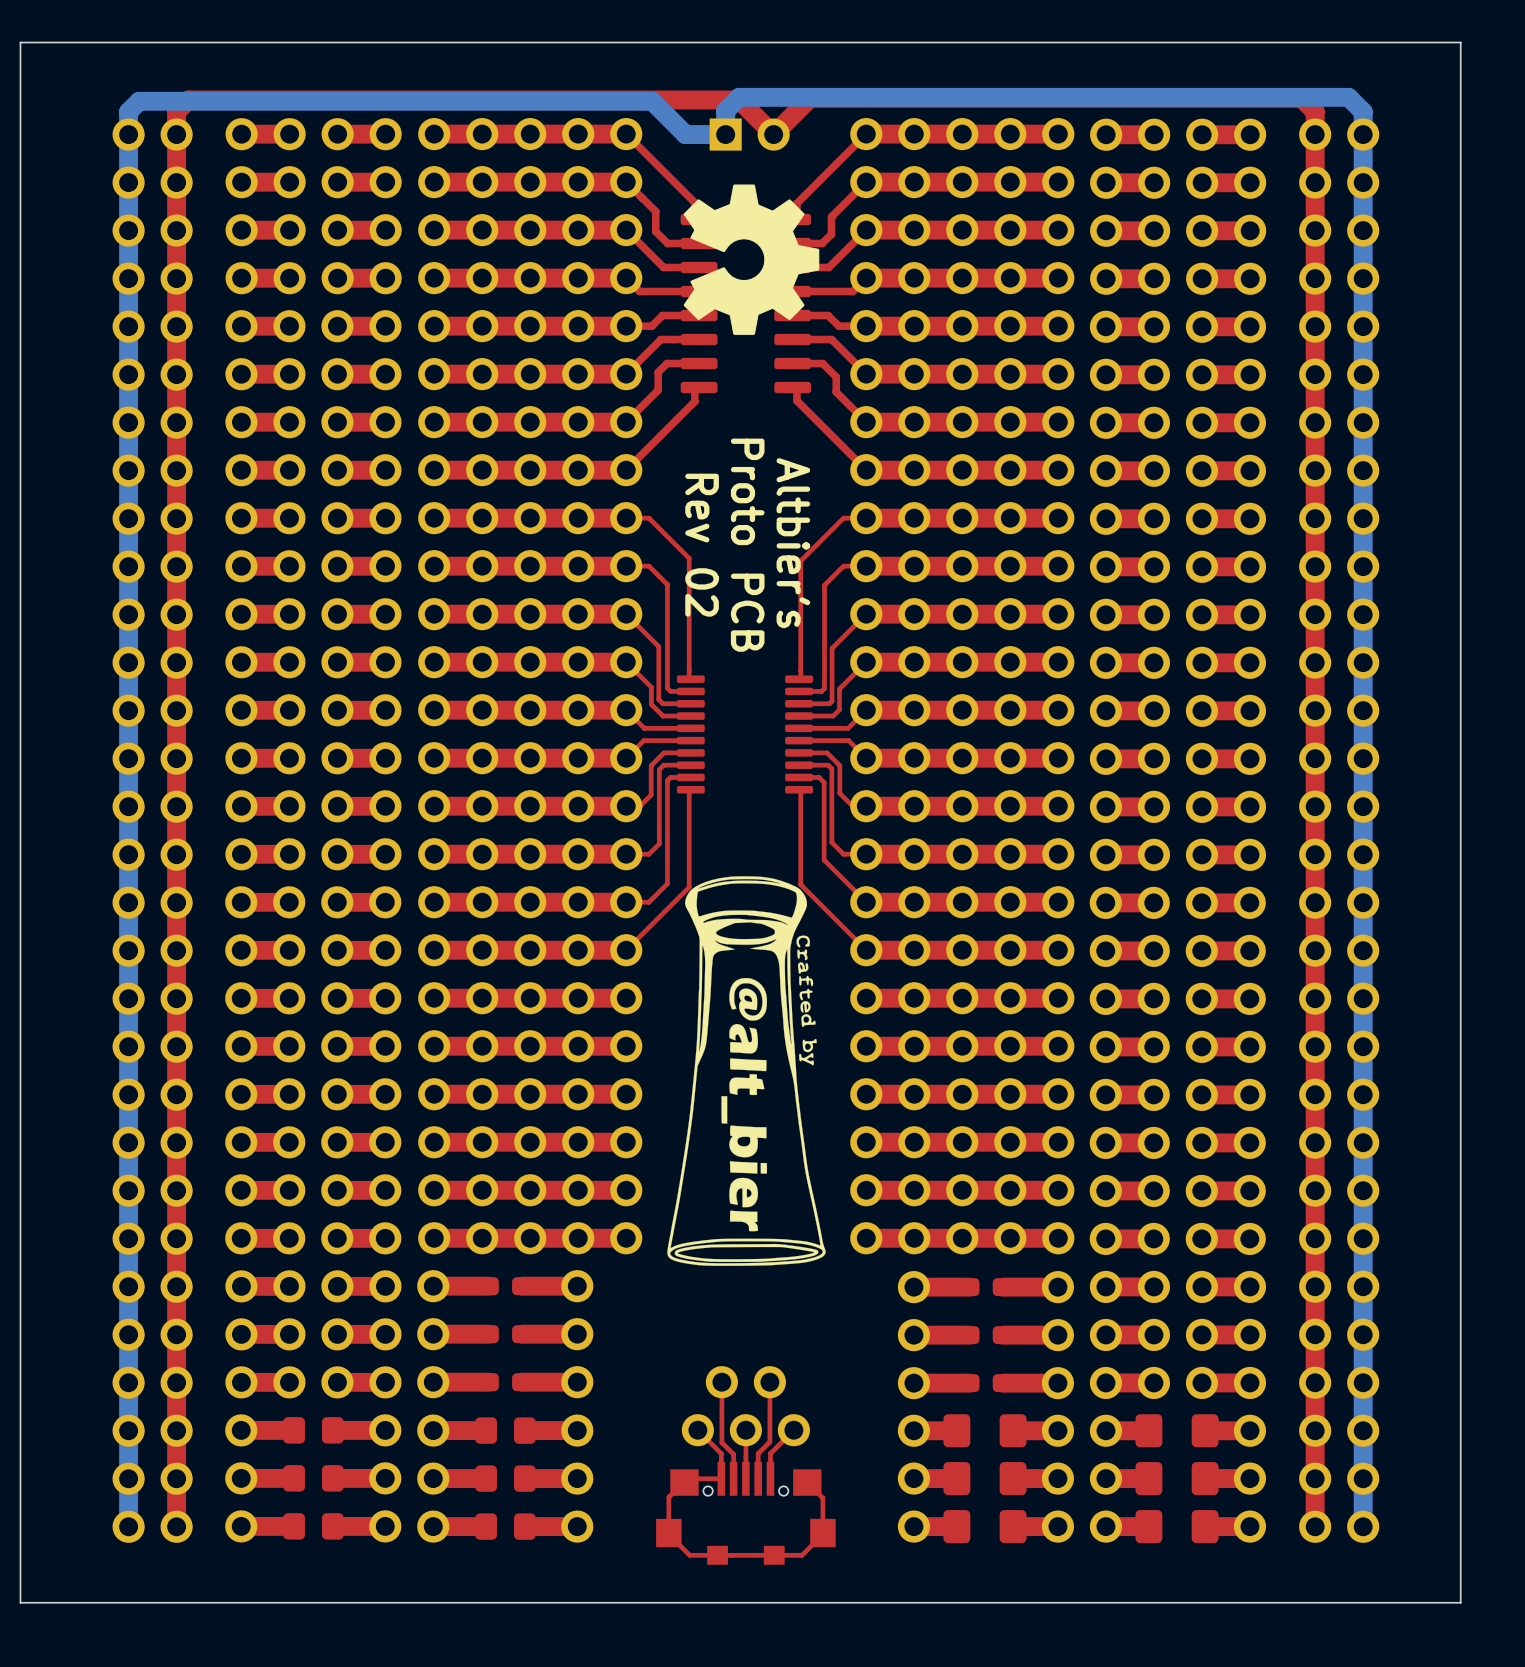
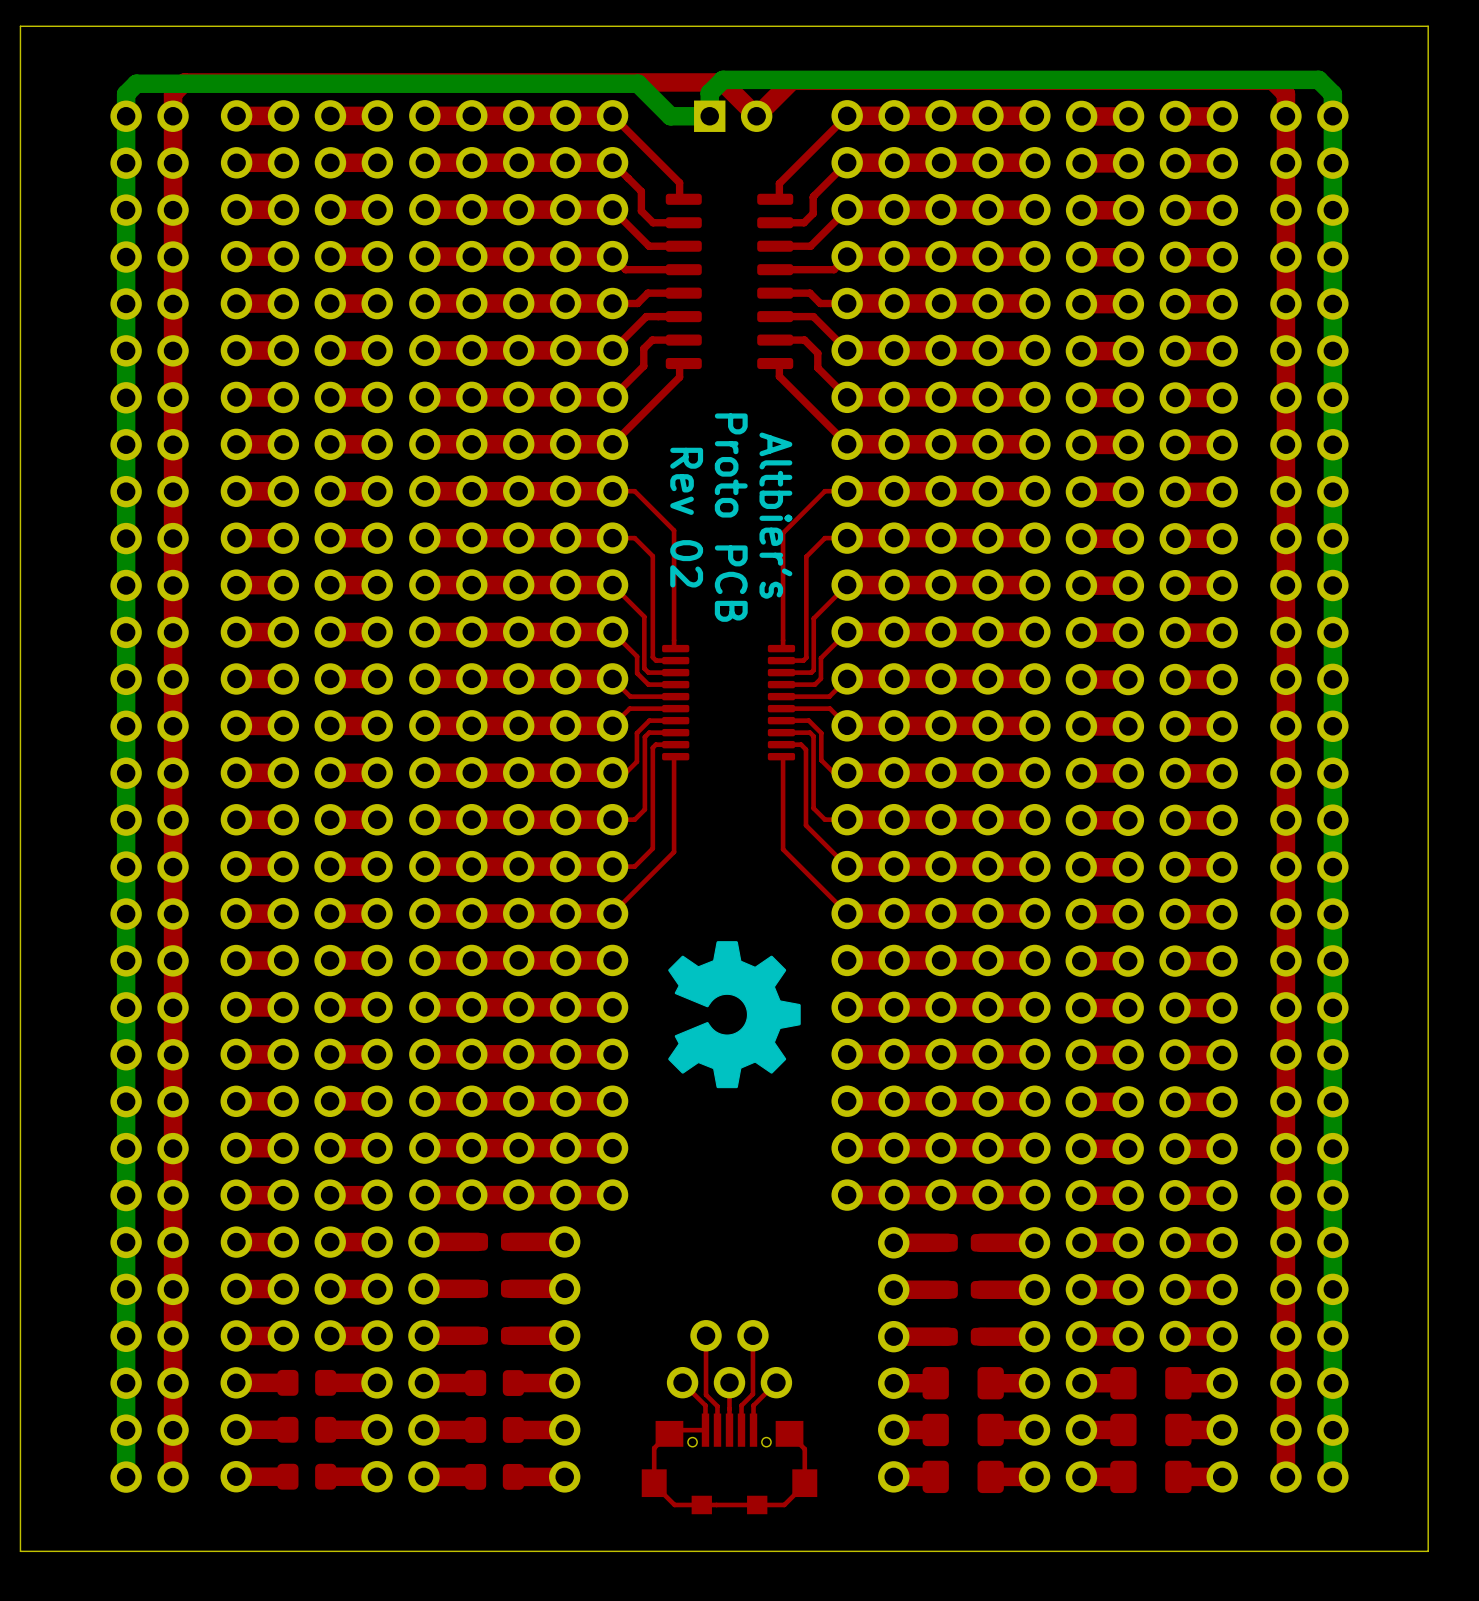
drawing: [683, 184, 820, 335] -> none
drawing shape: [667, 876, 826, 1266] -> [668, 941, 801, 1089]

